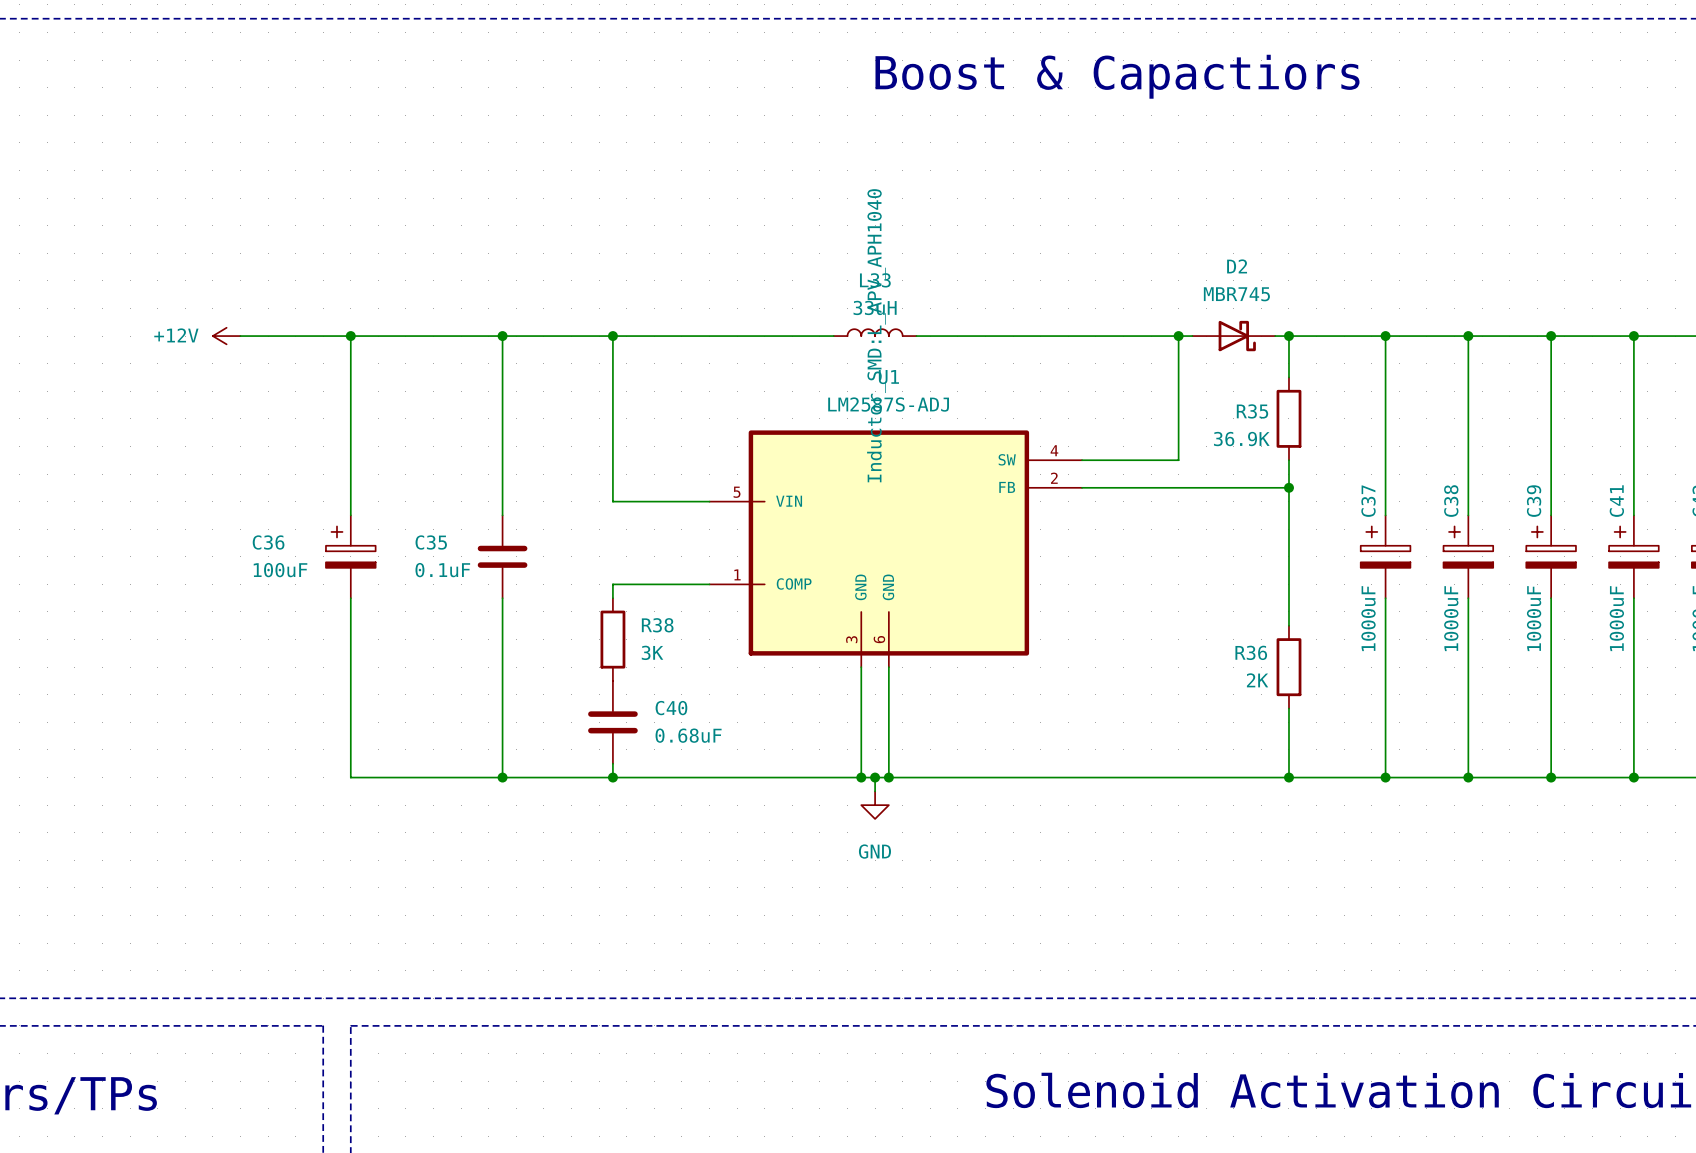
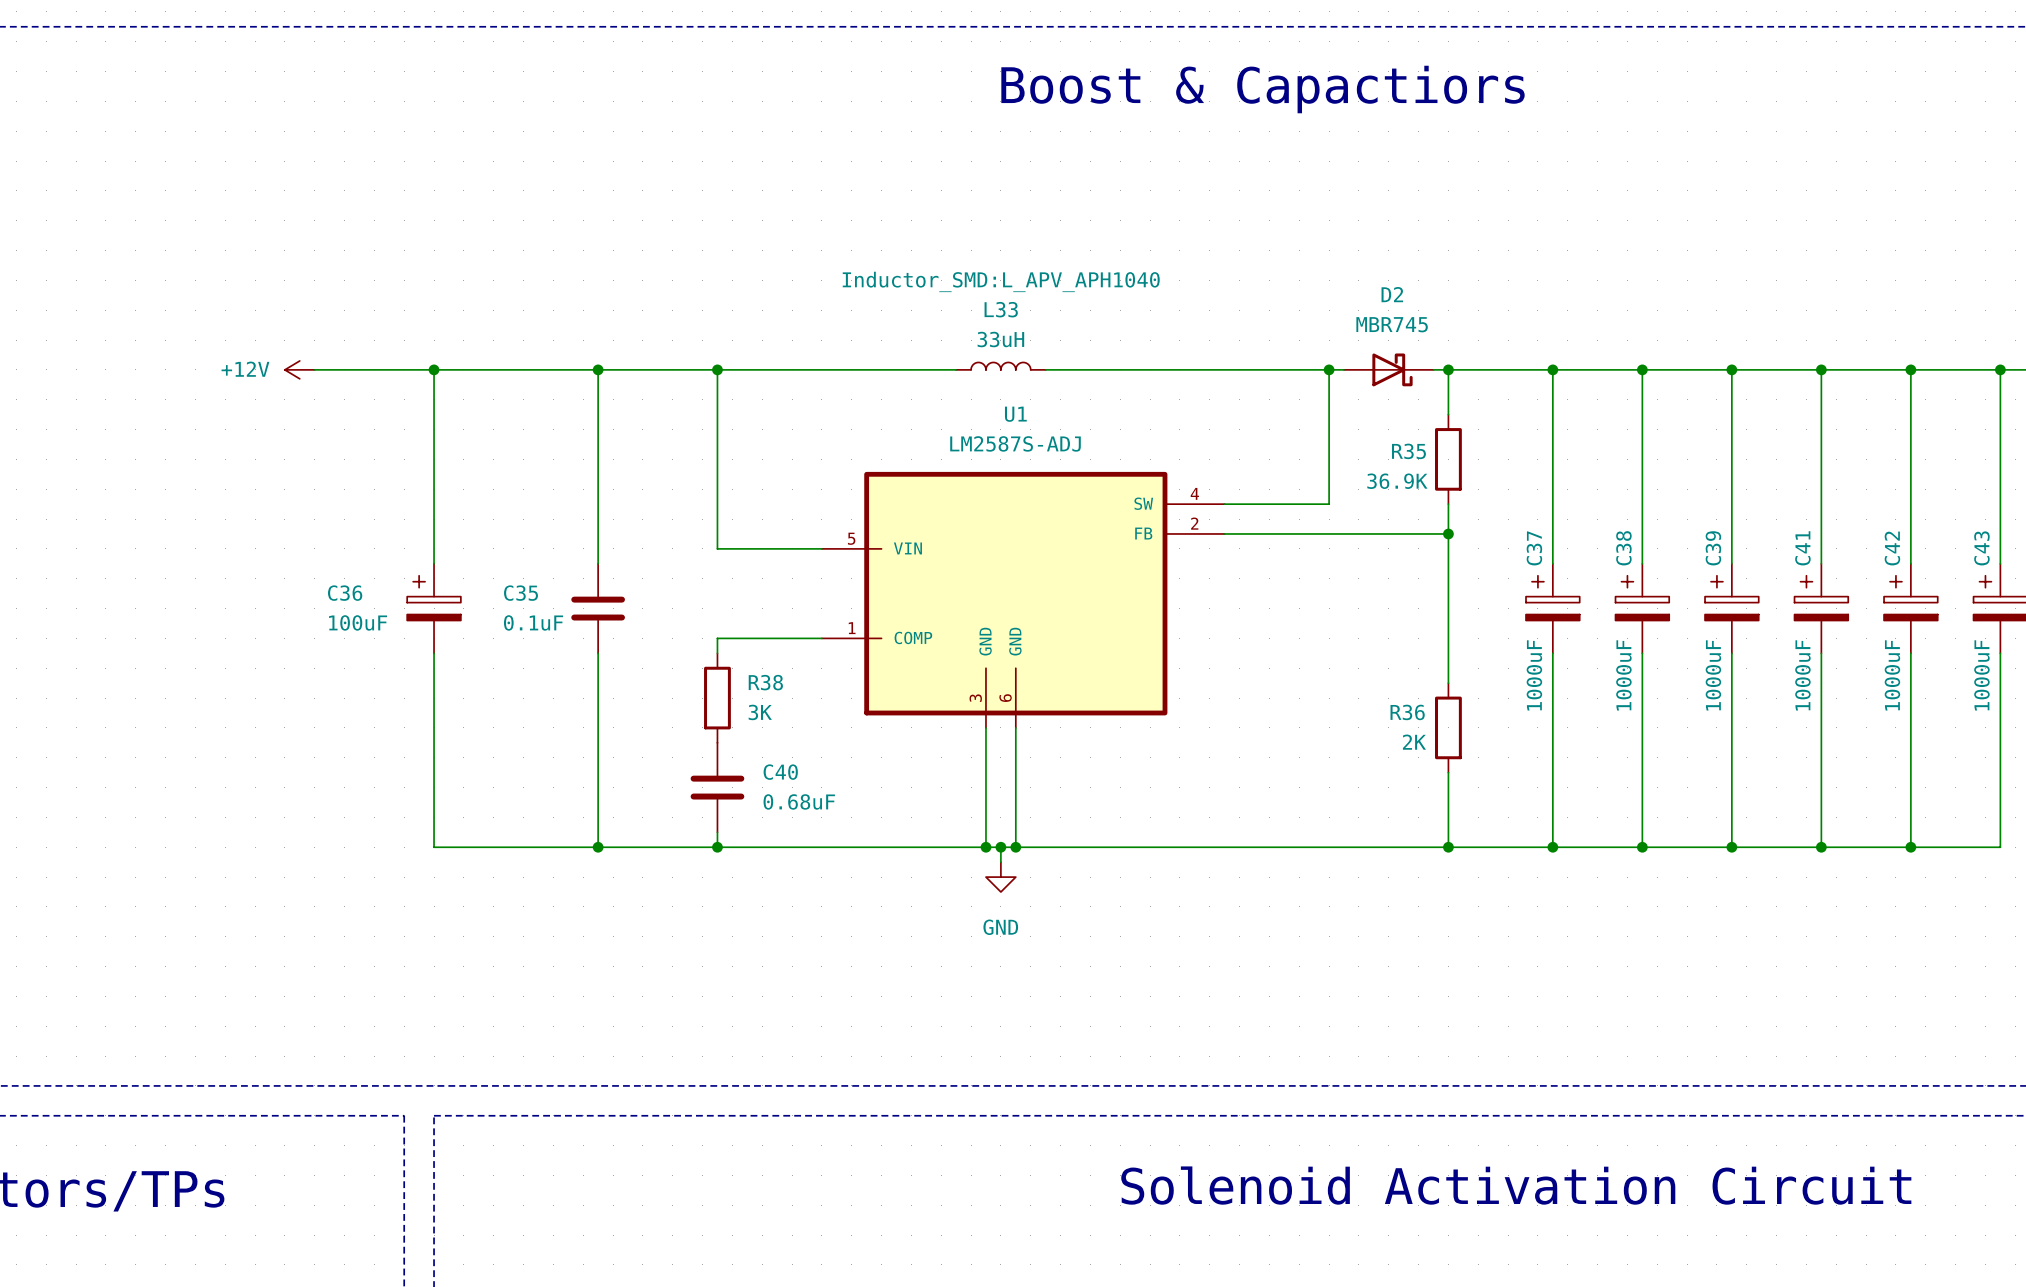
L33 text rotation: 0° (876, 335) -> 90° clockwise (1001, 281)

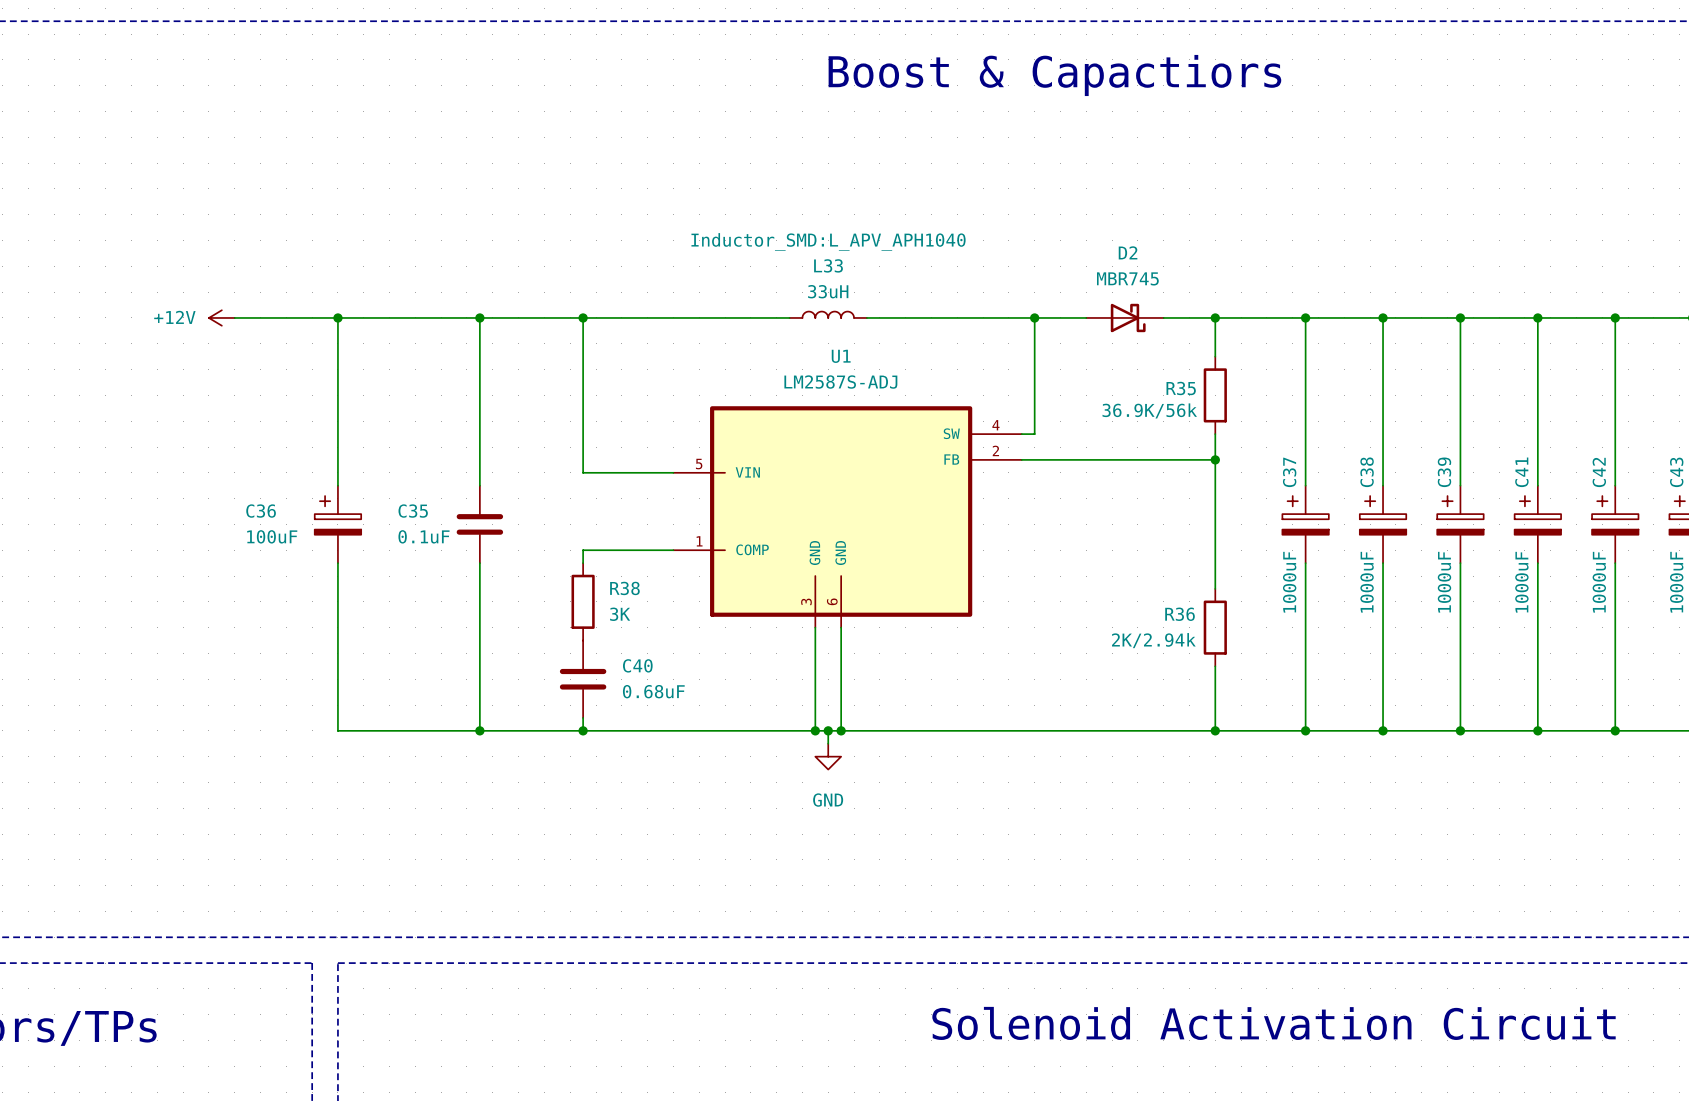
junction: none -> (1034, 317)
wire: (1329, 369) (1329, 504) (1239, 504) -> (1034, 317) (1034, 434)
junction: (1329, 369) -> none
D2 position: (1388, 369) -> (1124, 317)
R35 value: 36.9K (1397, 481) -> 36.9K/56k (1149, 410)
R36 value: 2K (1414, 742) -> 2K/2.94k (1153, 640)

